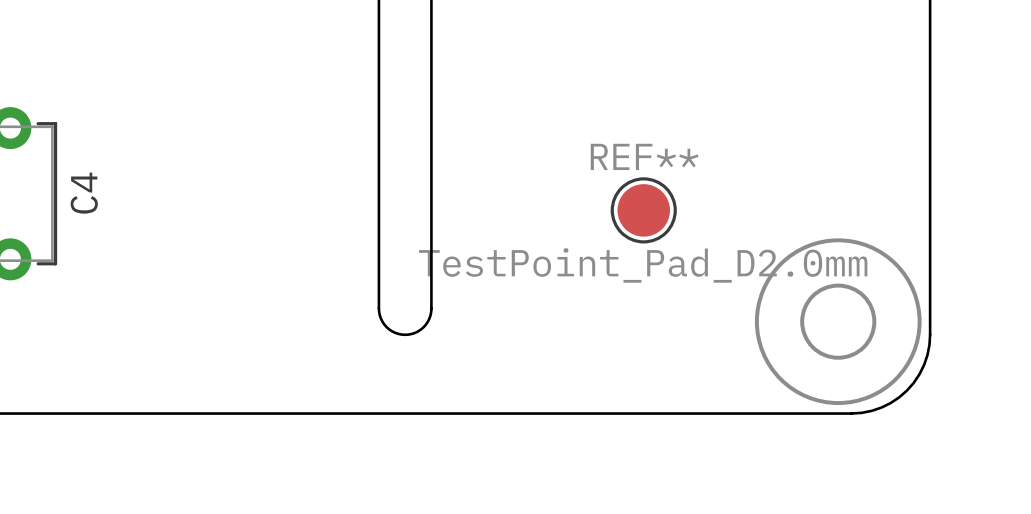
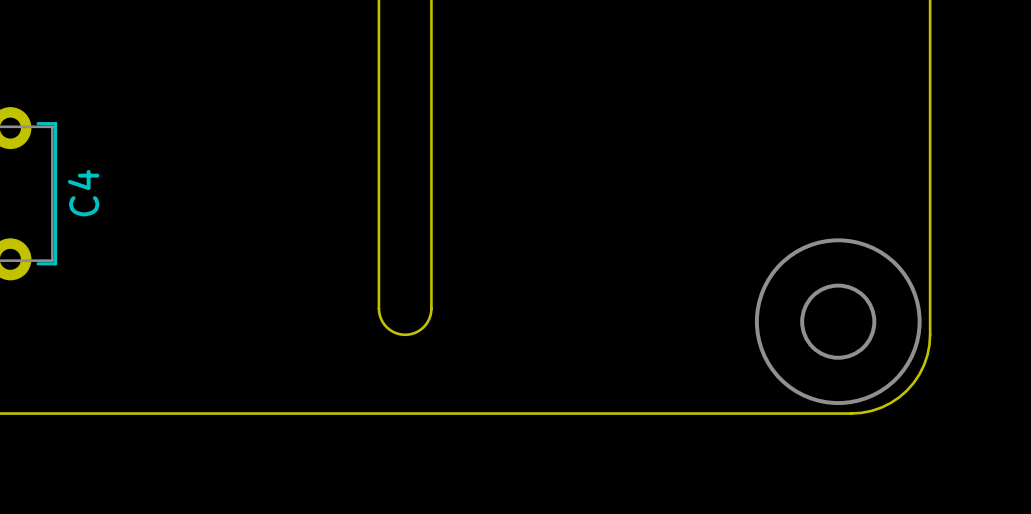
REF**: TestPoint_Pad_D2.0mm (643, 210) -> none

